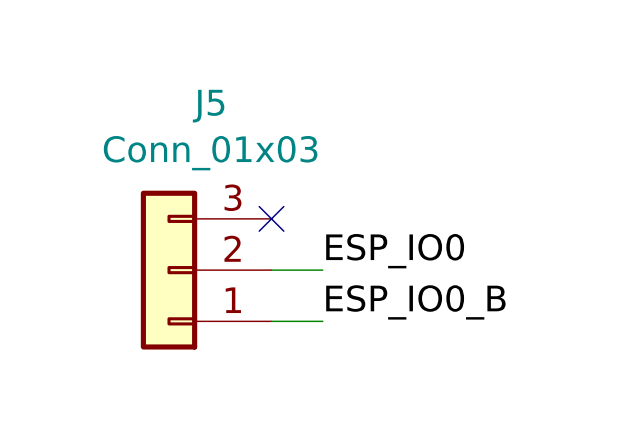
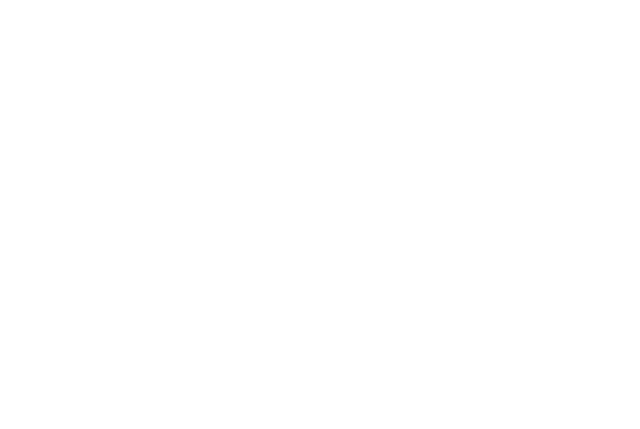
no-connect mark: (271, 218) -> none
label: ESP_IO0 (395, 251) -> none
J5: Conn_01x03 (206, 270) -> none
wire: (271, 270) (322, 270) -> none
label: ESP_IO0_B (415, 302) -> none
wire: (271, 321) (322, 321) -> none

